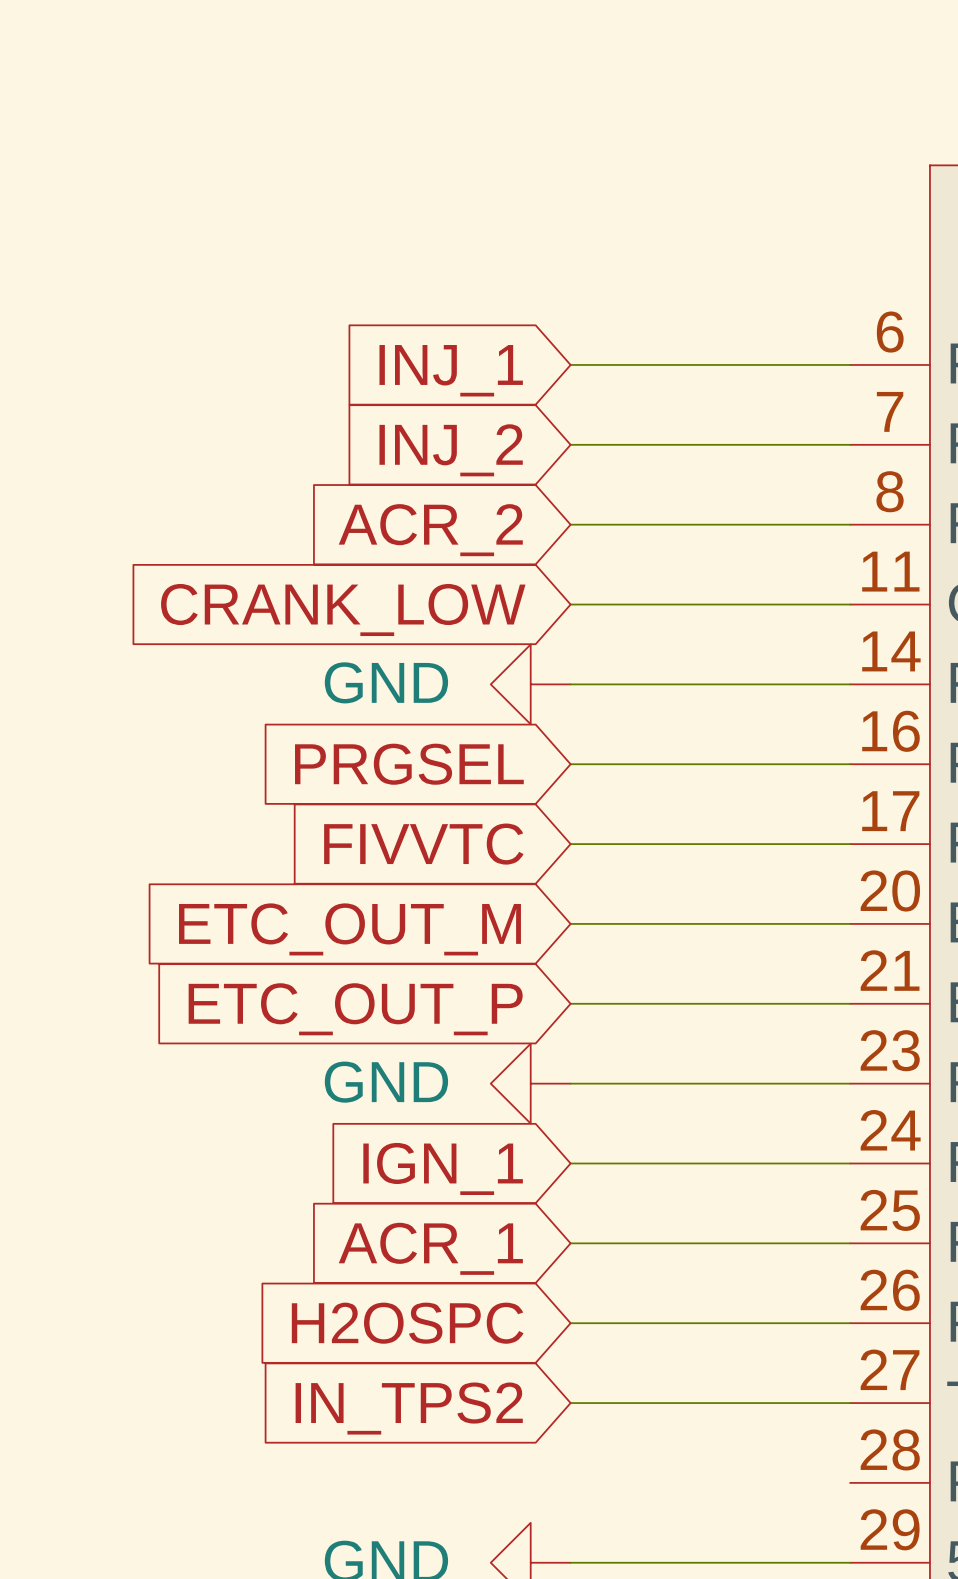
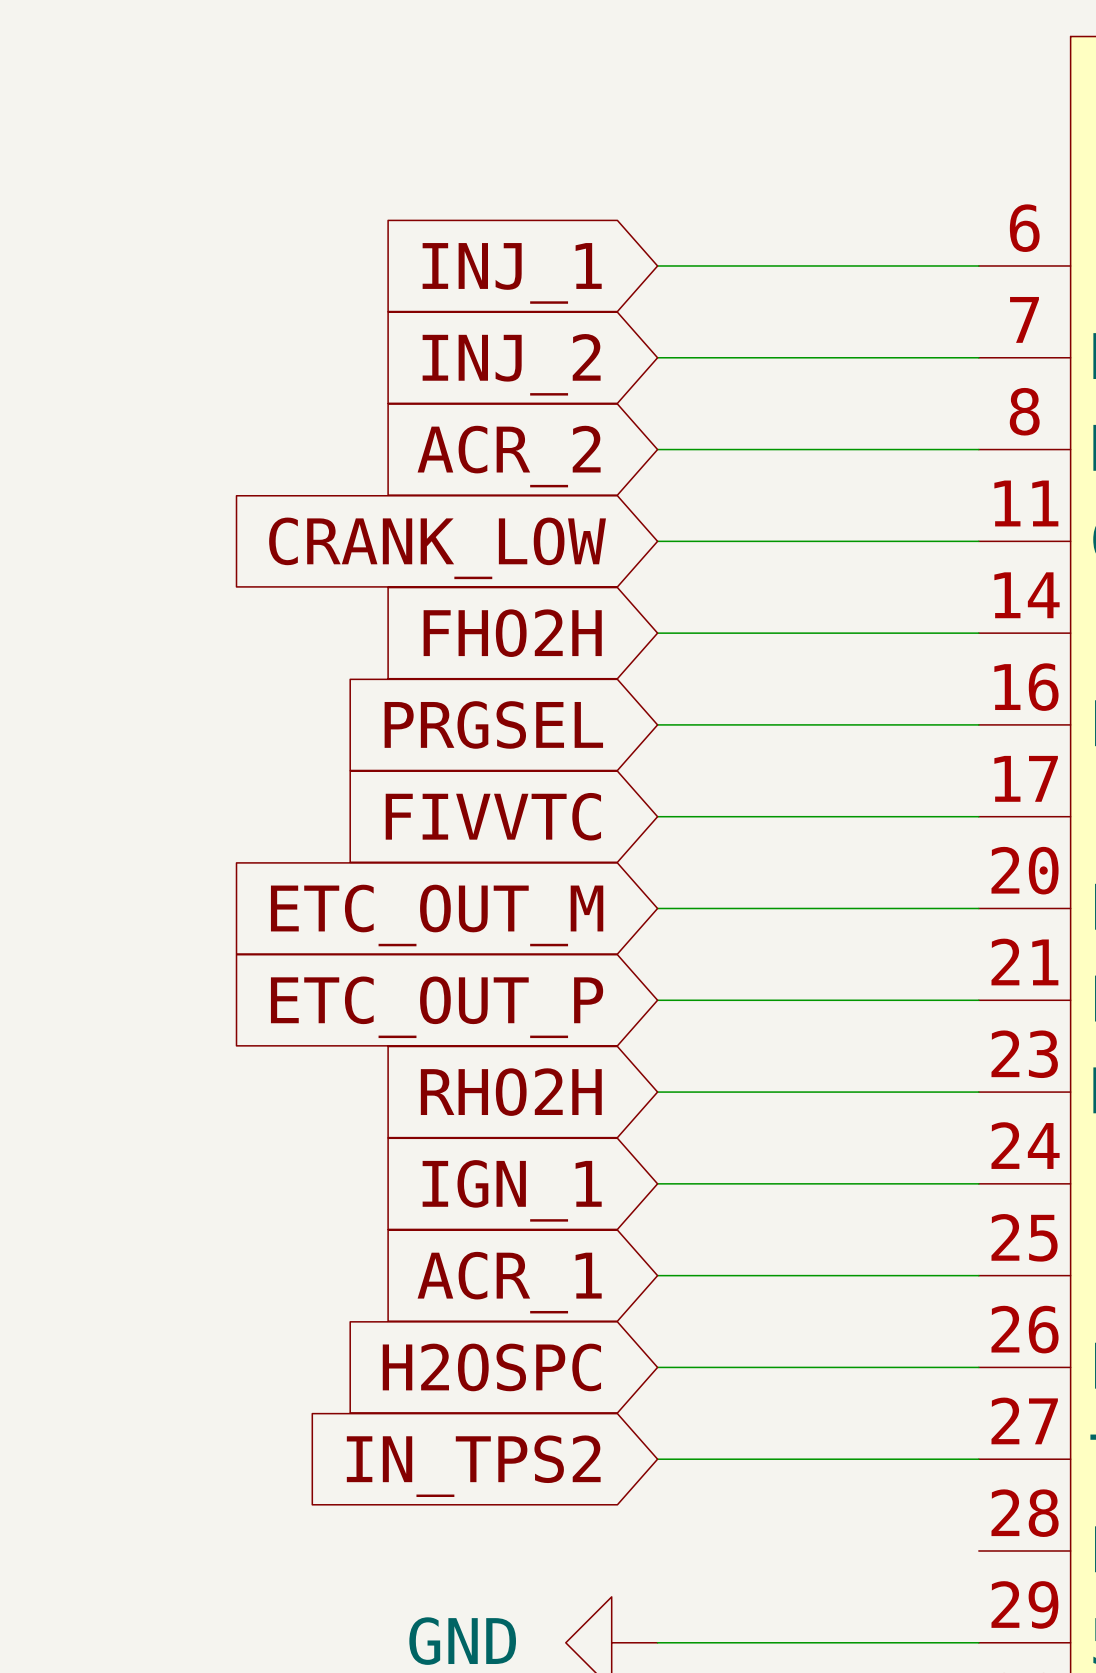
global label: none -> FHO2H (512, 633)
power symbol: GND (530, 684) -> none
global label: none -> RHO2H (511, 1092)
power symbol: GND (530, 1083) -> none

